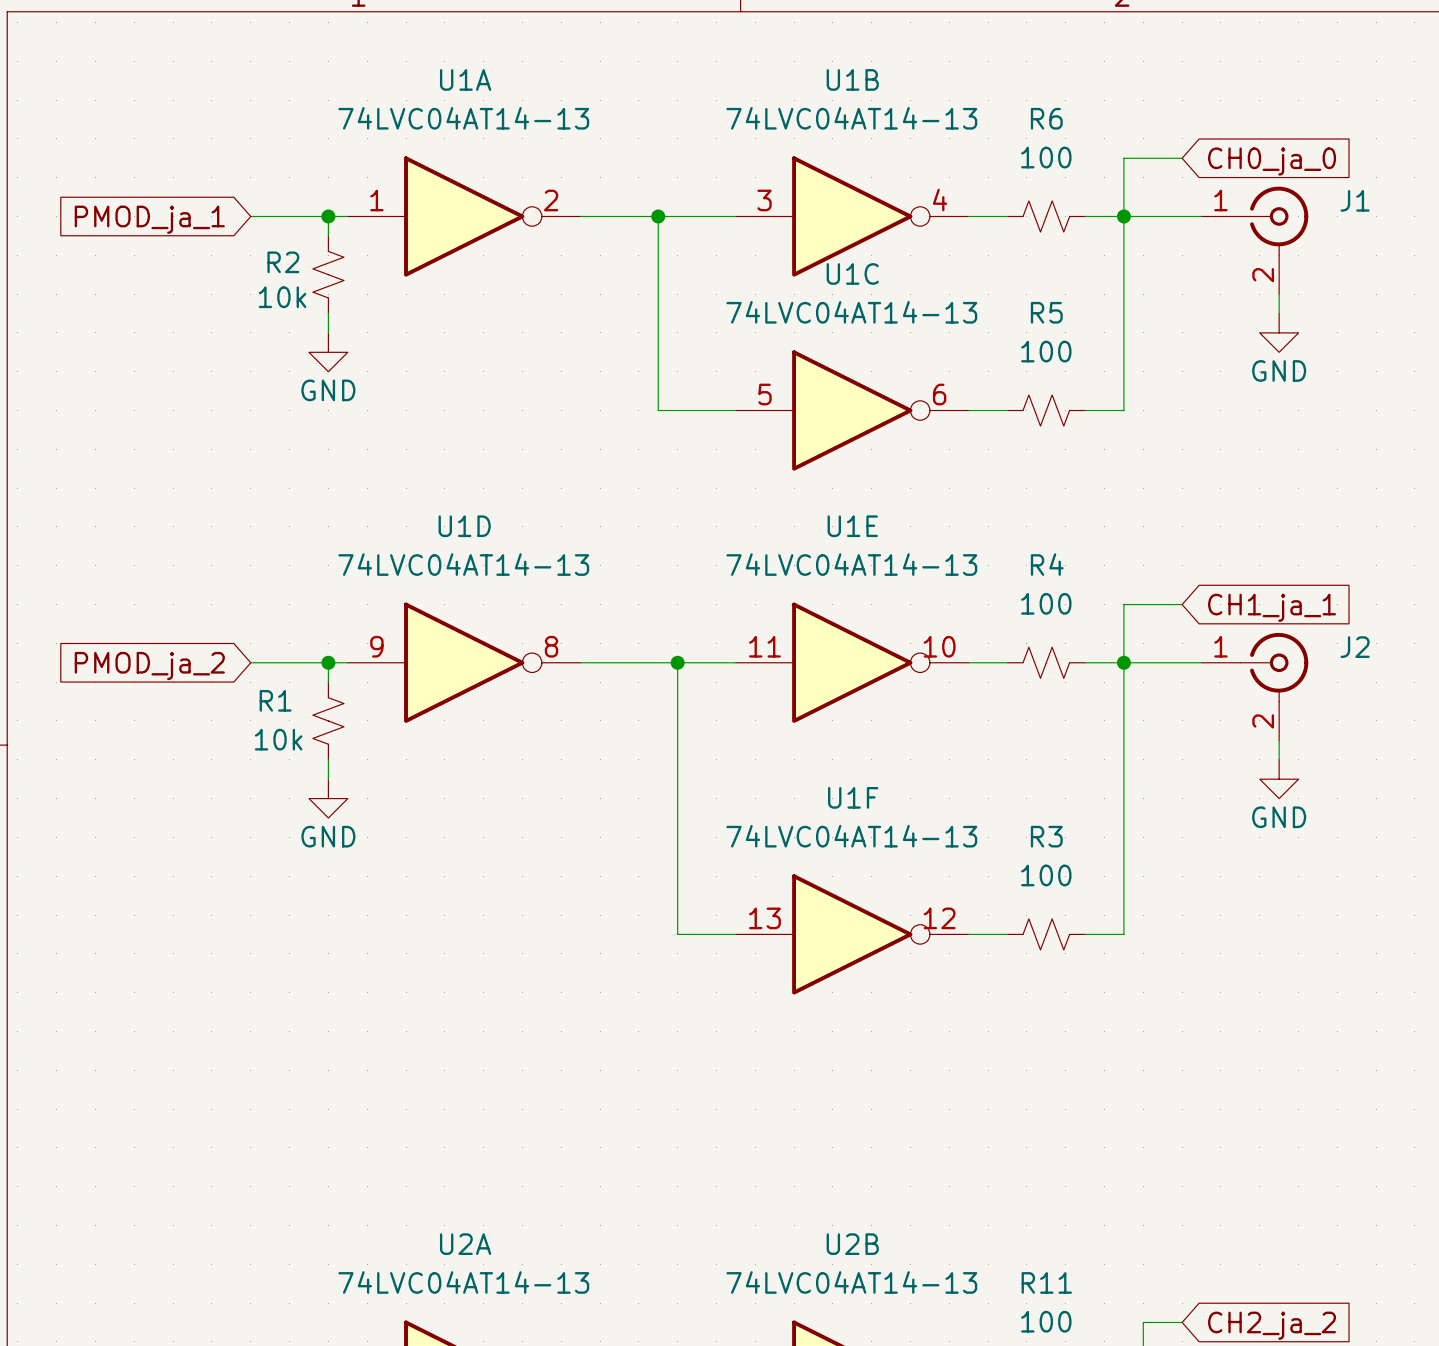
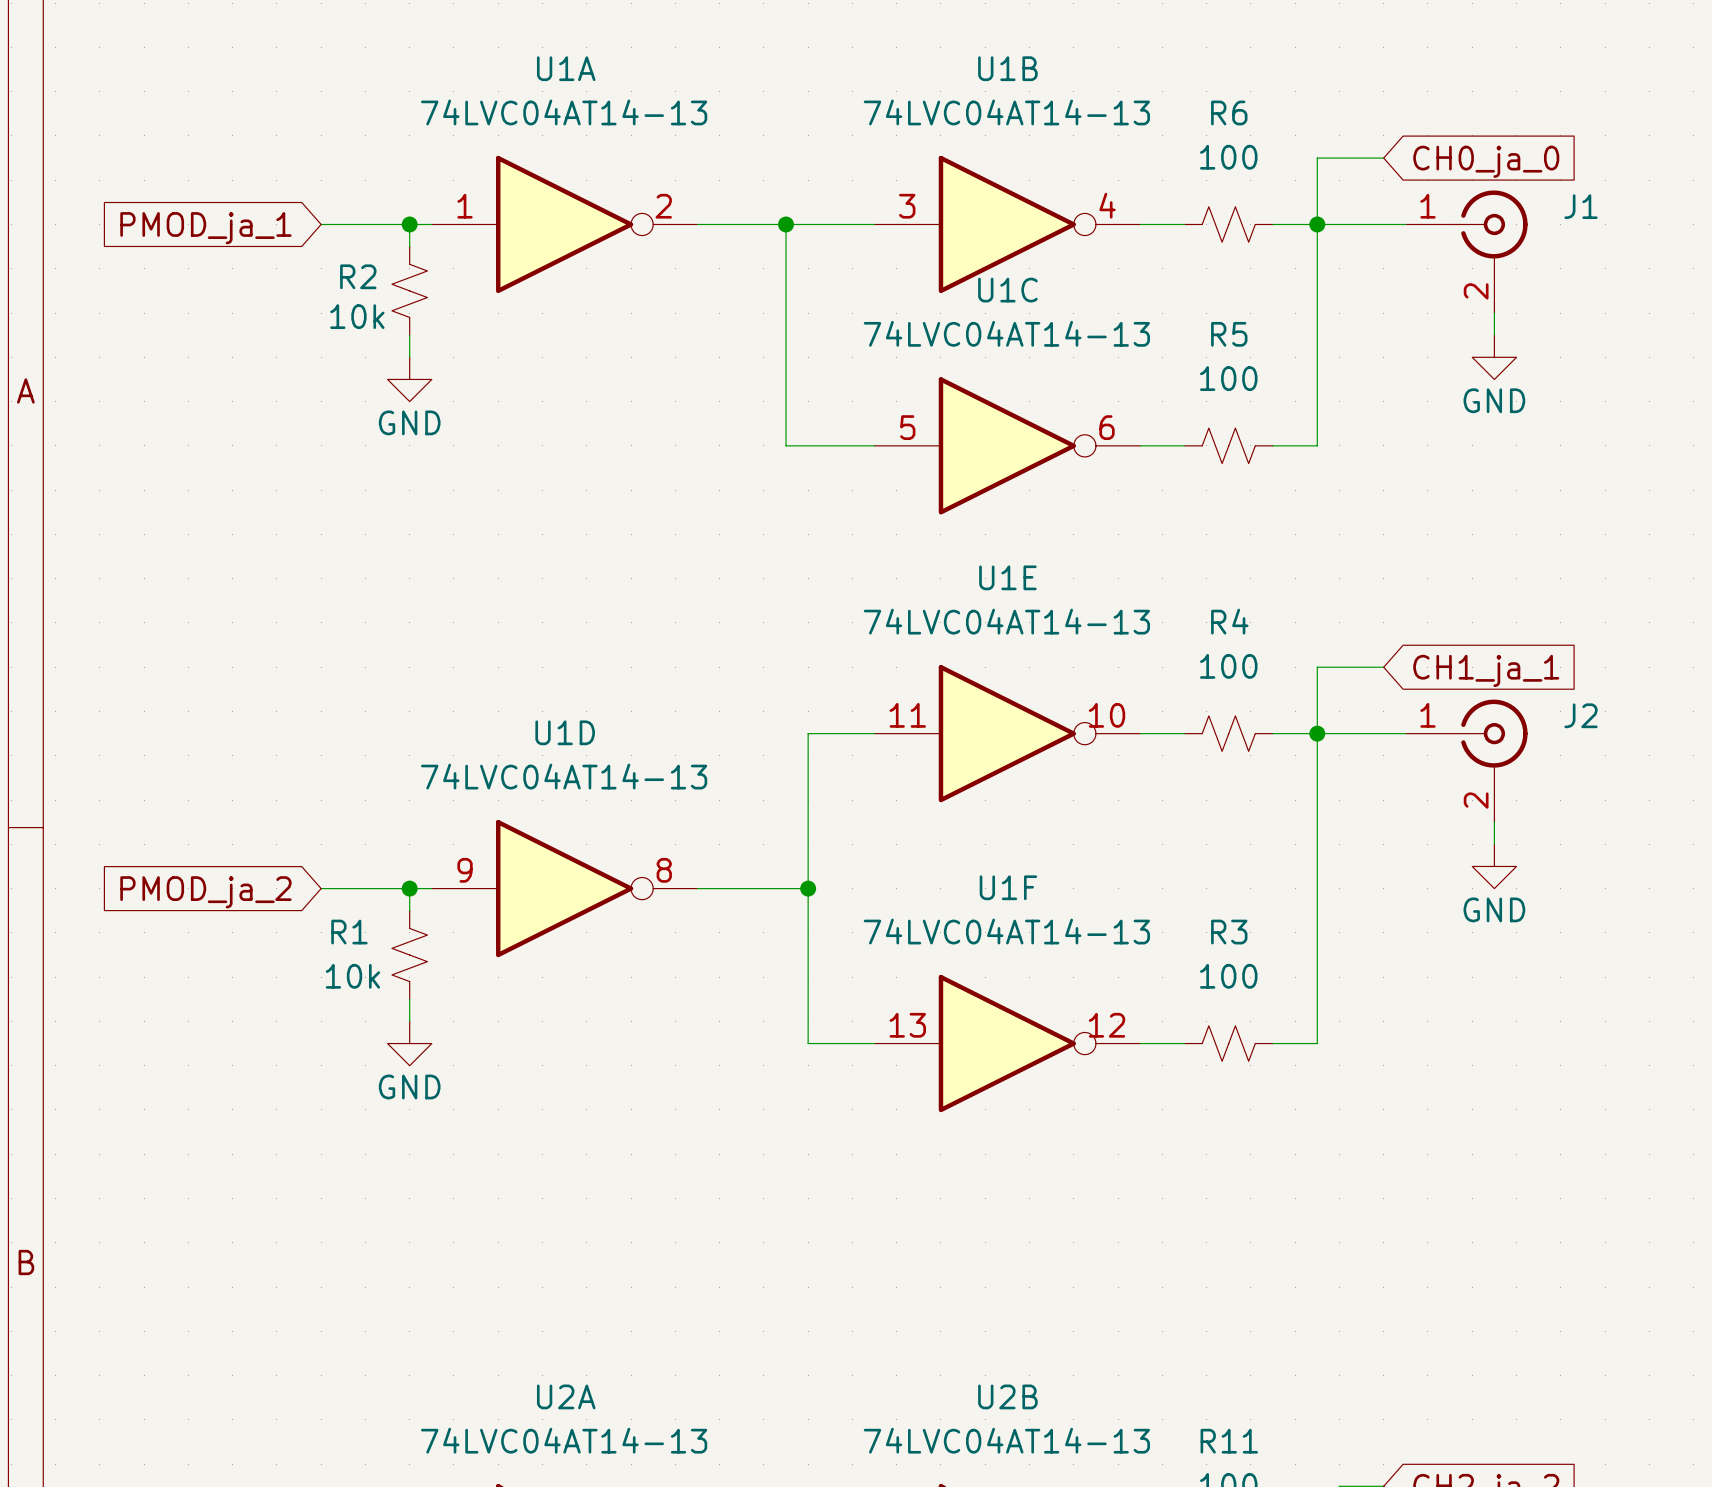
wire: (250, 662) (347, 662) -> (321, 888) (431, 888)
wire: (328, 662) (328, 682) -> (409, 999) (409, 1021)
junction: (328, 662) -> none
U1D position: (464, 662) -> (564, 888)
wire: (580, 662) (677, 662) -> (697, 888) (808, 888)
junction: (677, 662) -> none
global label position: PMOD_ja_2 (149, 666) -> PMOD_ja_2 (205, 892)
R1 position: (328, 720) -> (409, 955)
wire: (328, 759) (328, 779) -> (409, 888) (409, 910)
junction: none -> (409, 888)
power symbol position: GND (328, 798) -> GND (409, 1043)
junction: none -> (808, 888)

